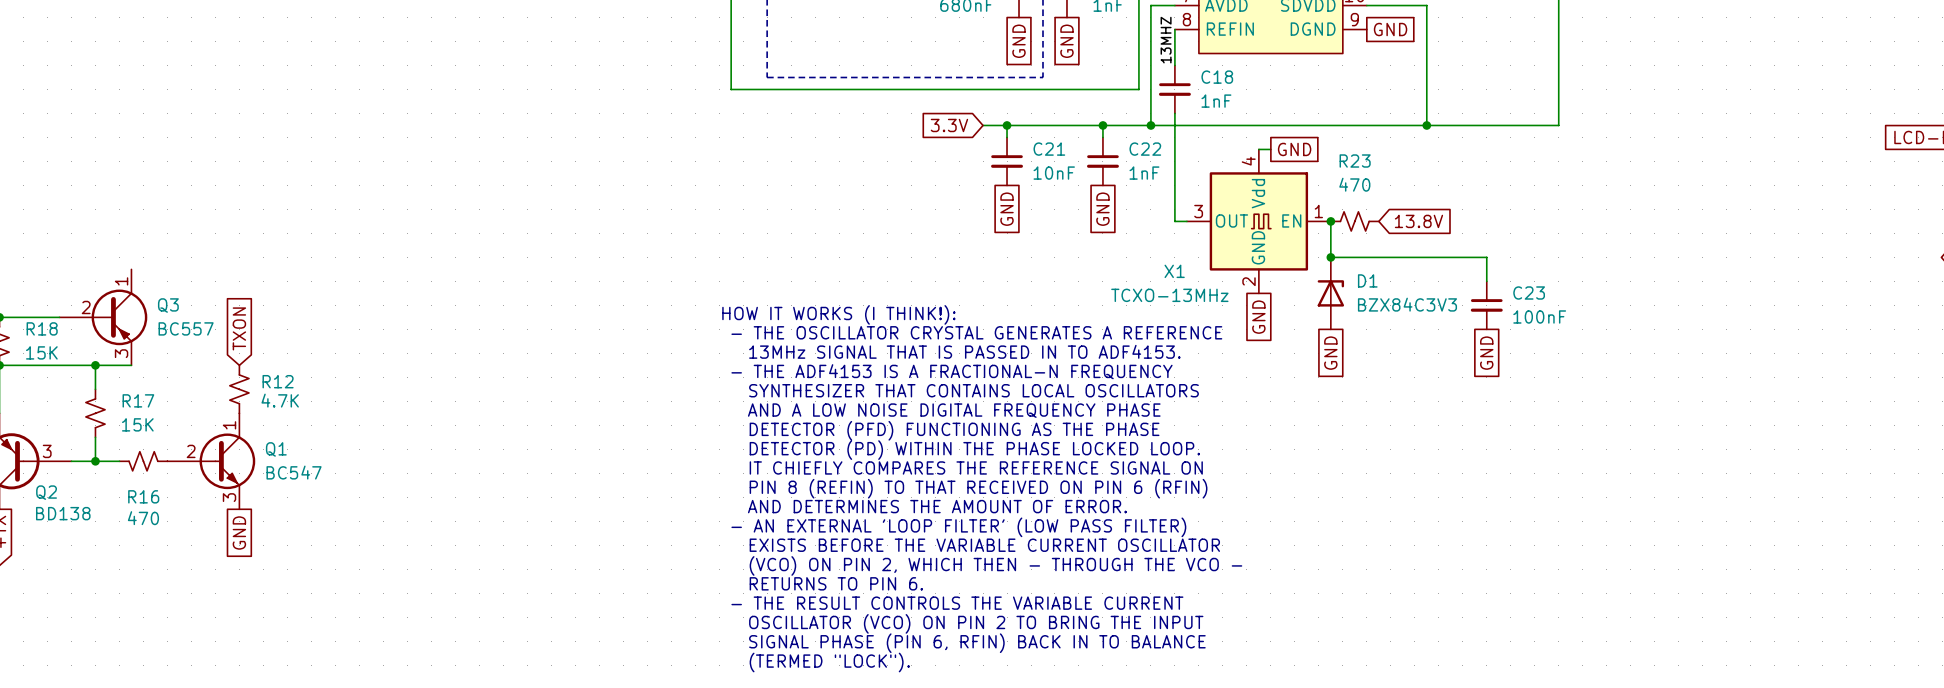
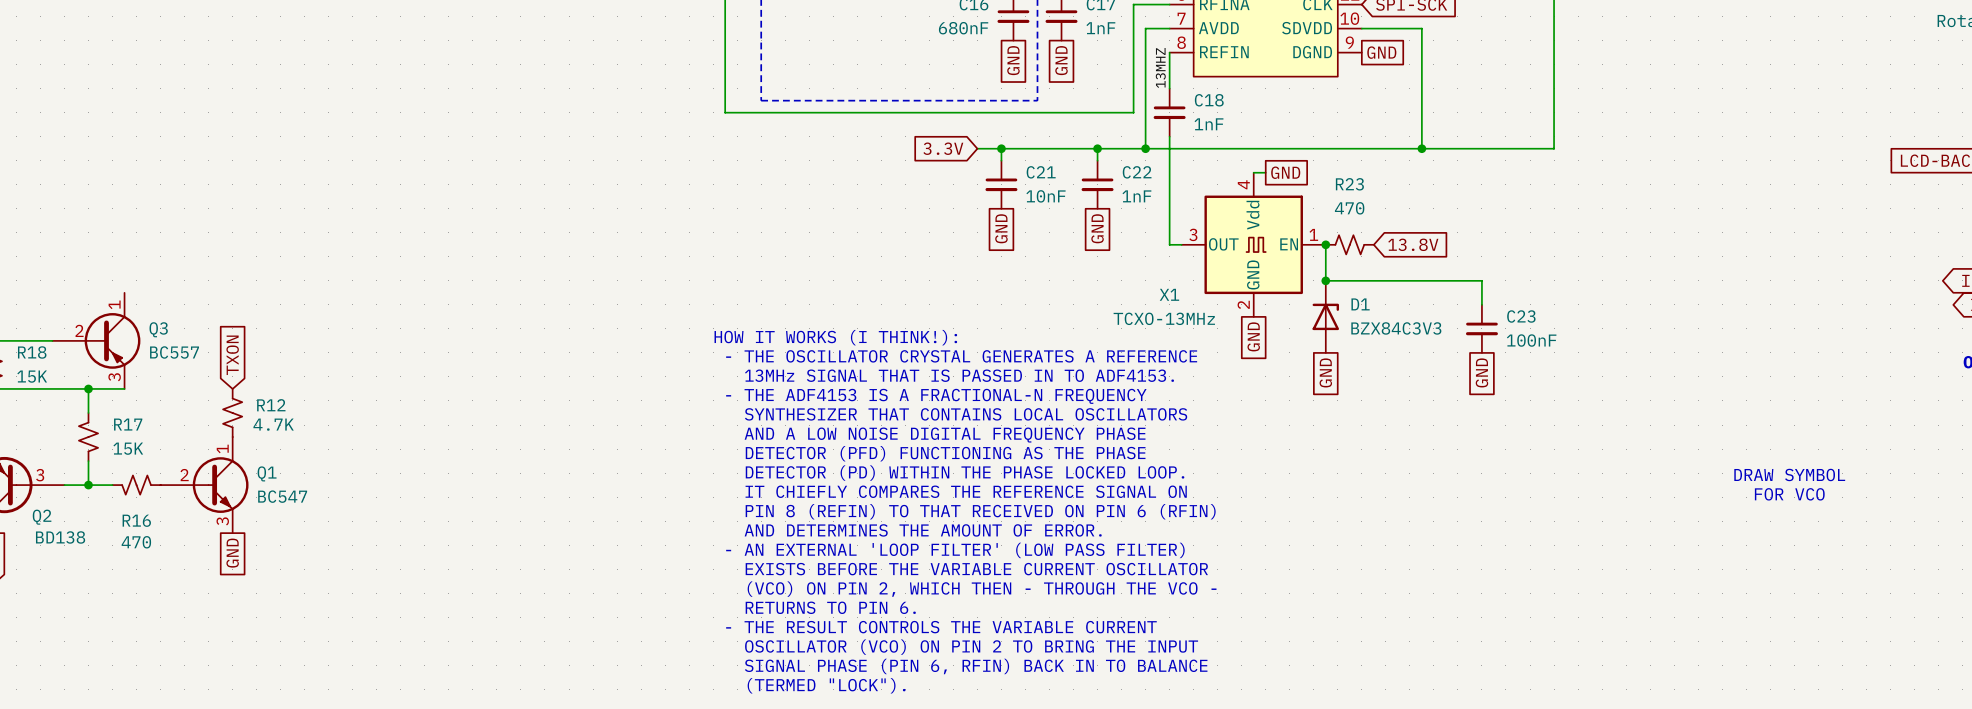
text: none -> DRAW SYMBOL (1789, 474)
text: none -> FOR VCO (1789, 494)

